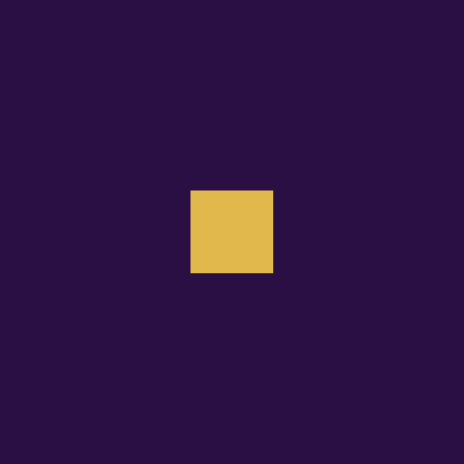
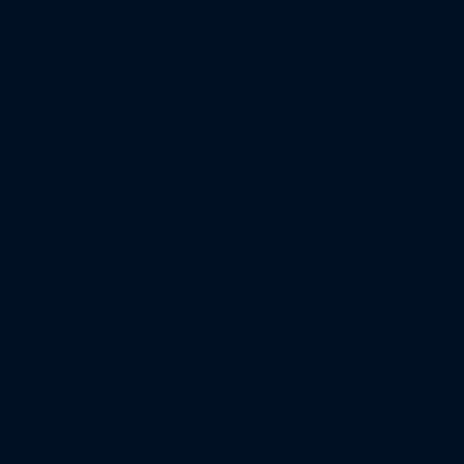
part: (231, 231) -> none

